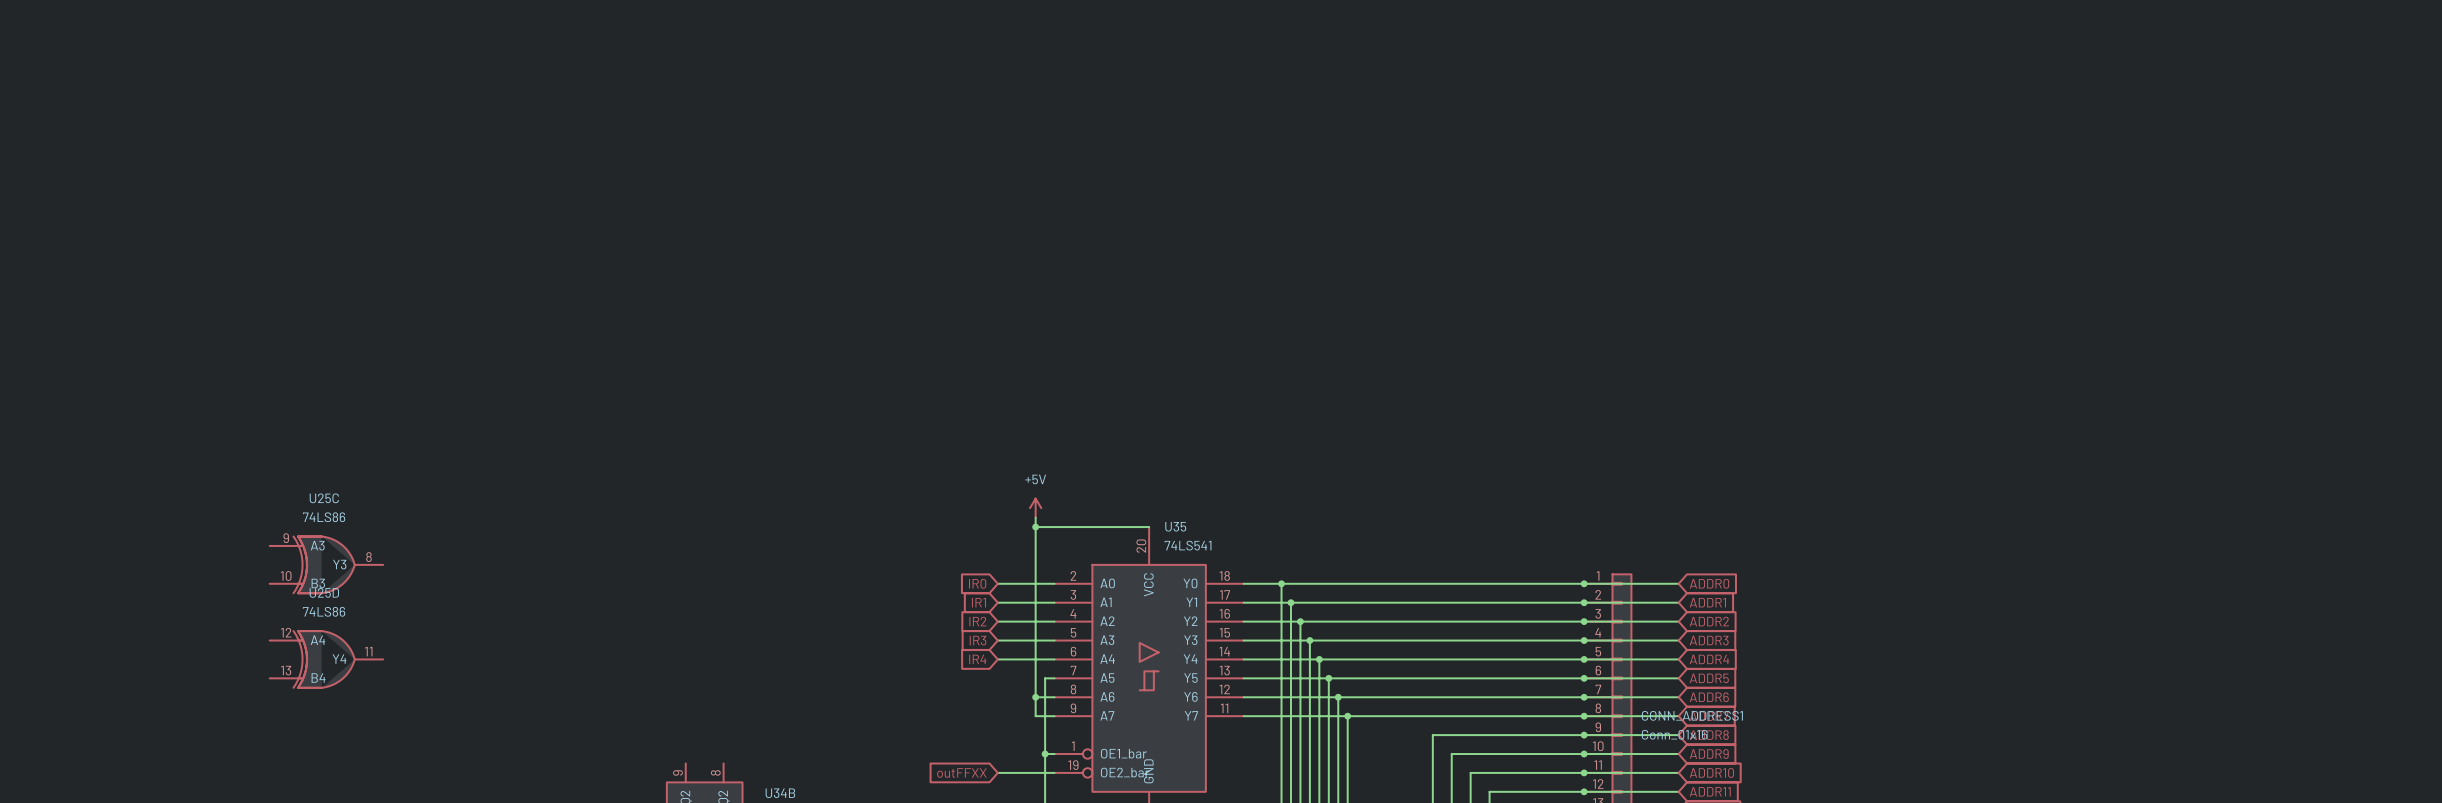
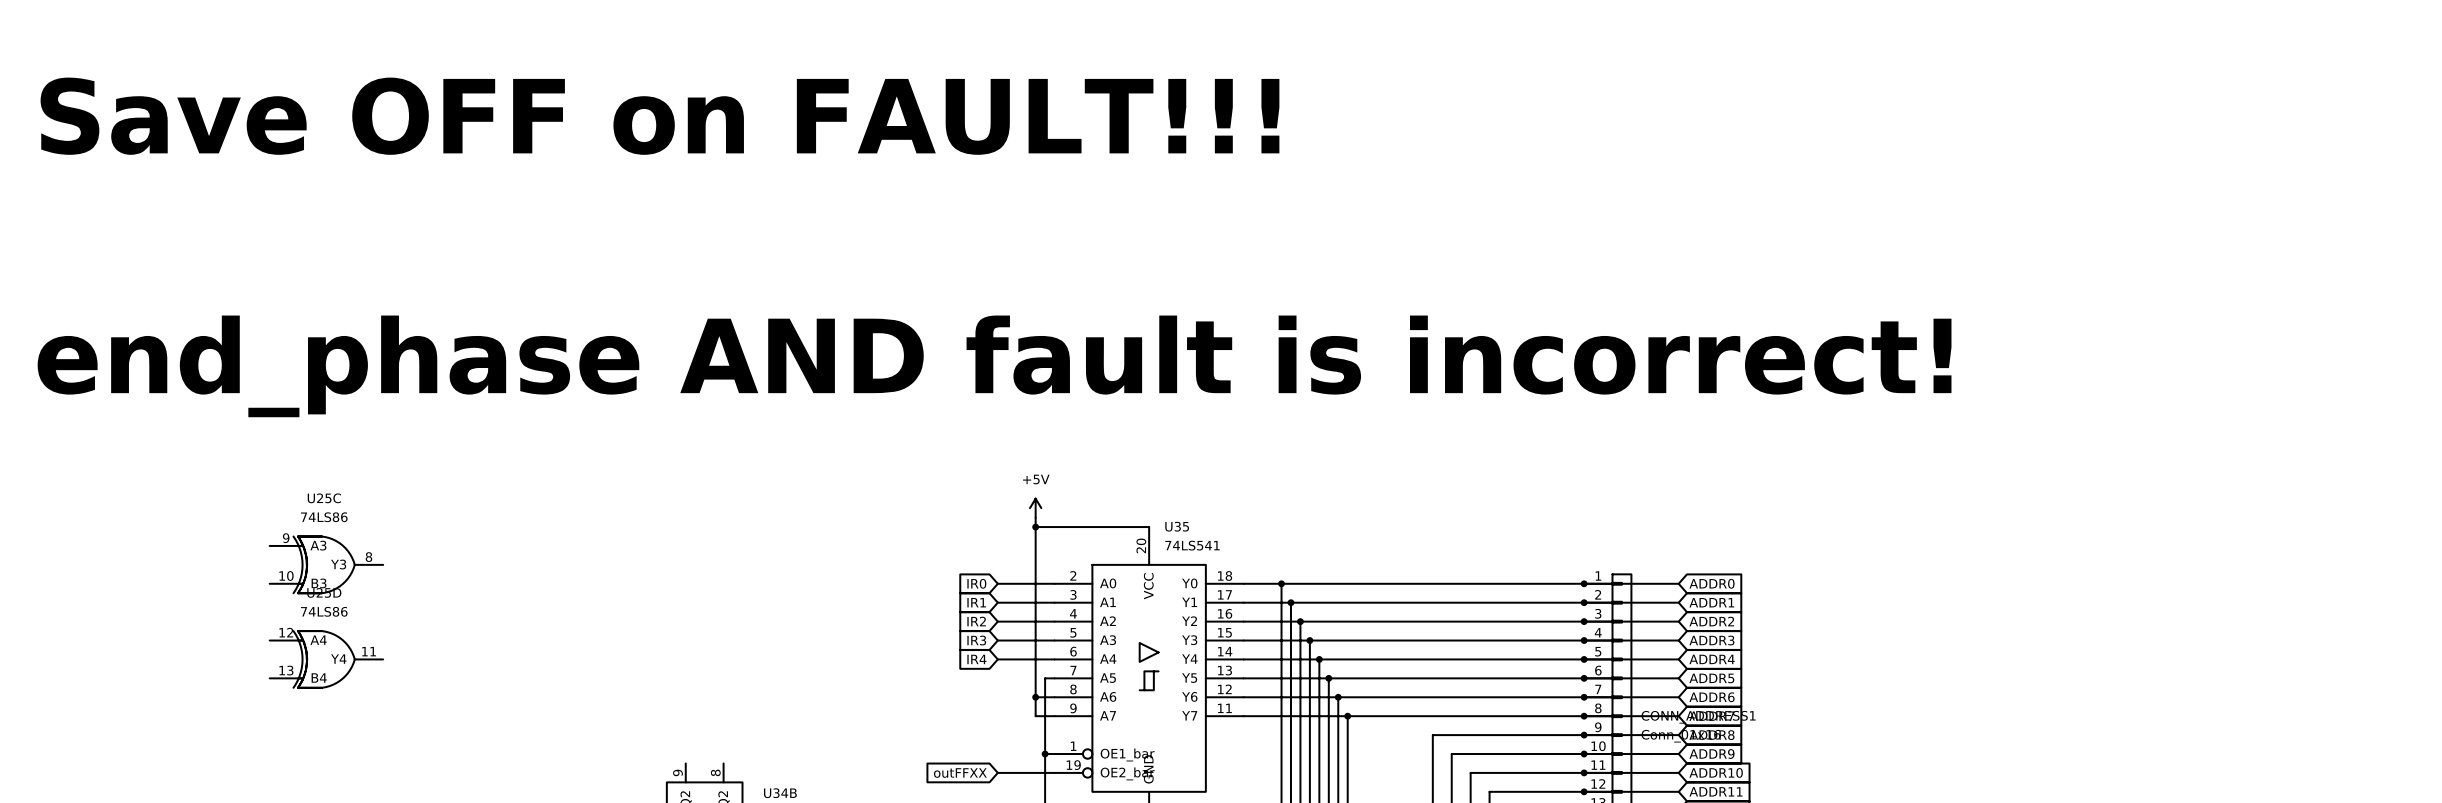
text: none -> Save OFF on FAULT!!! (660, 116)
text: none -> end_phase AND fault is incorrect! (994, 366)

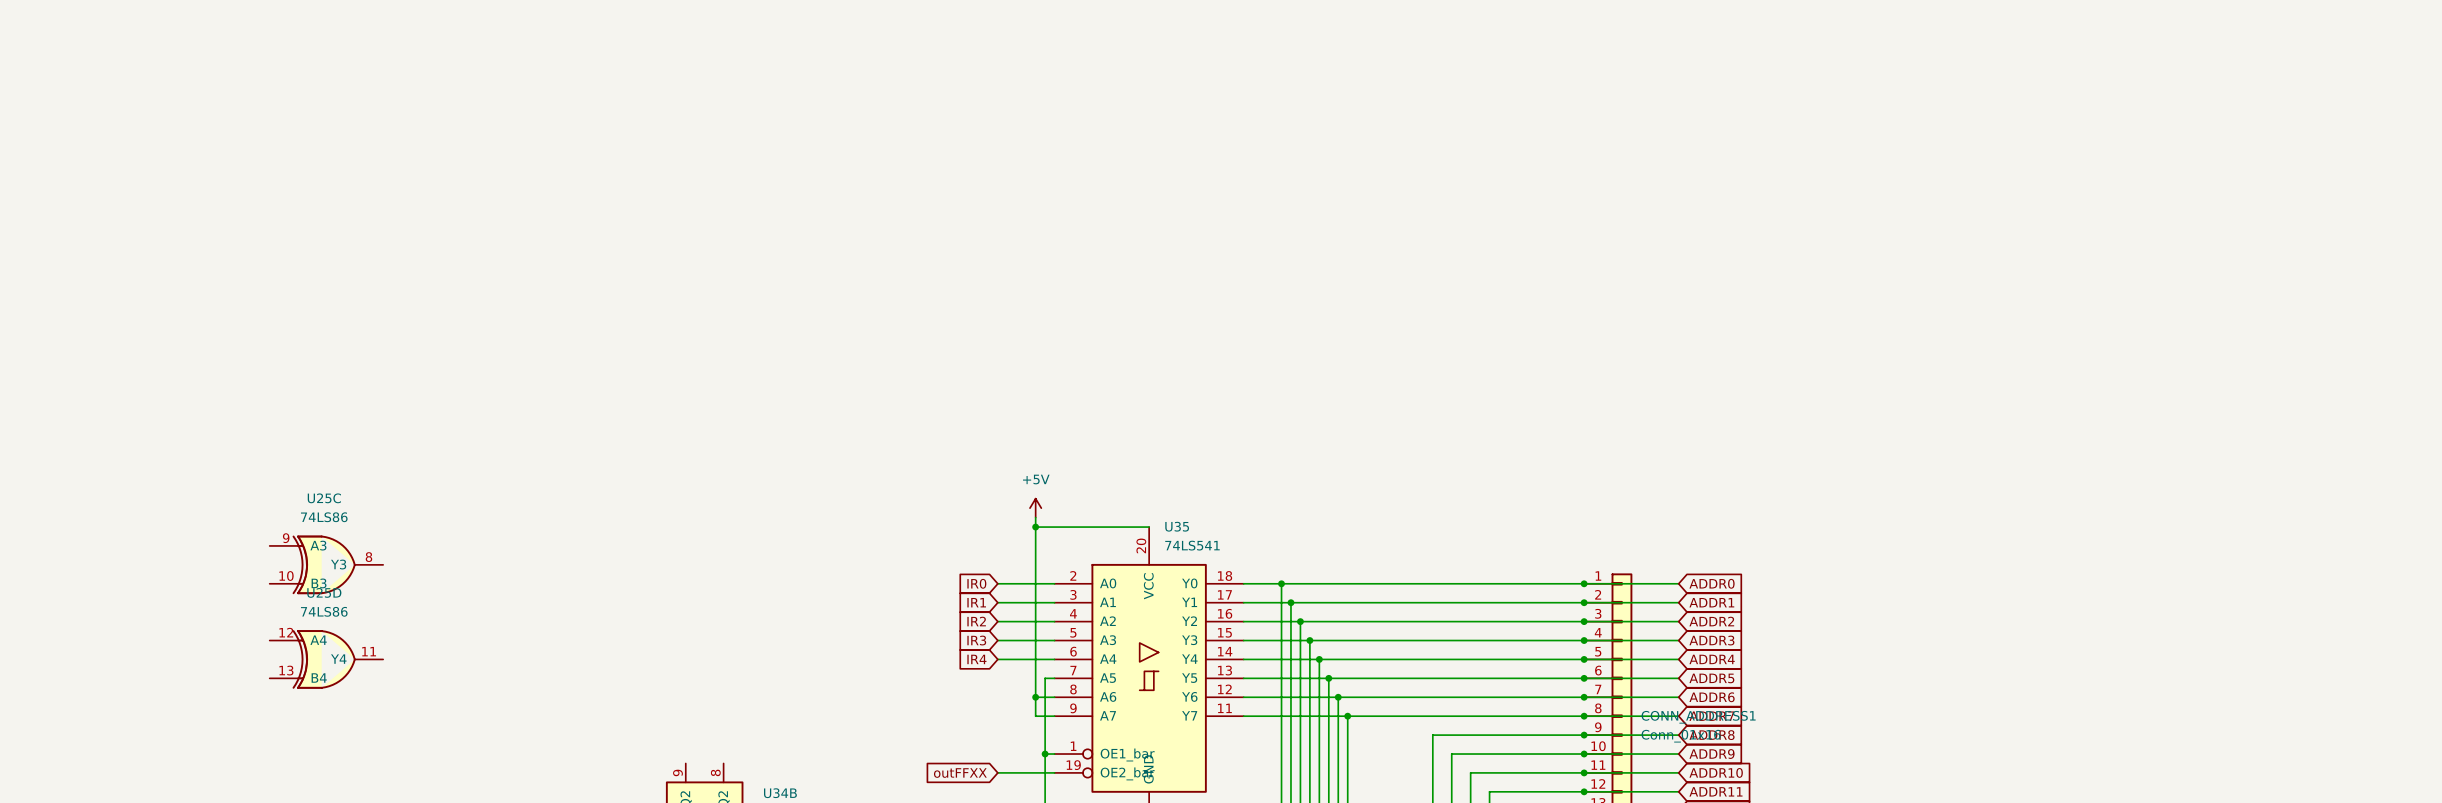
text: Save OFF on FAULT!!! (660, 116) -> none
text: end_phase AND fault is incorrect! (994, 366) -> none

